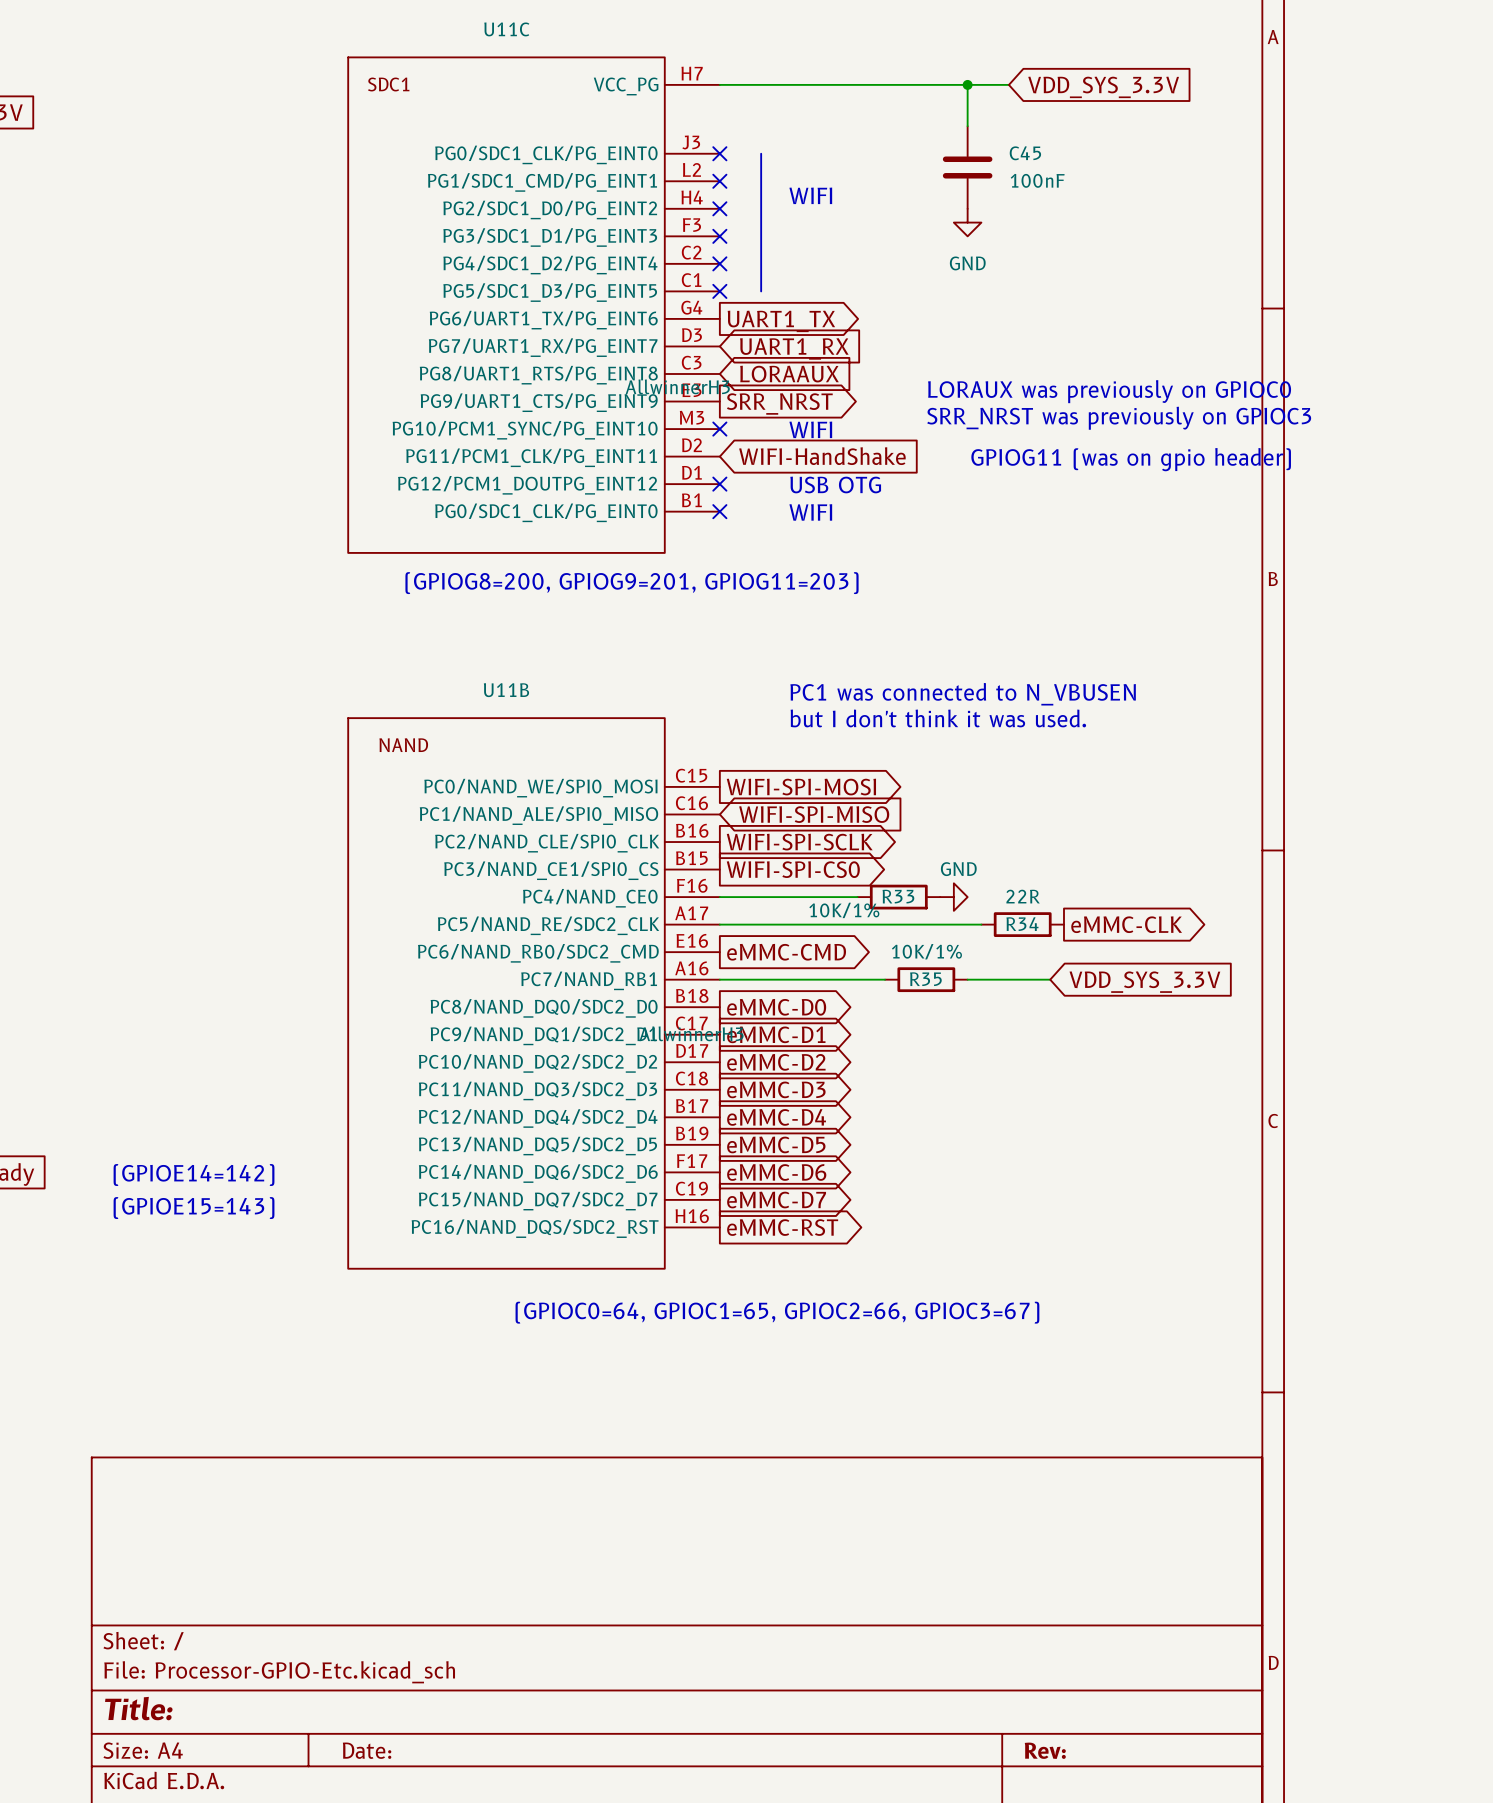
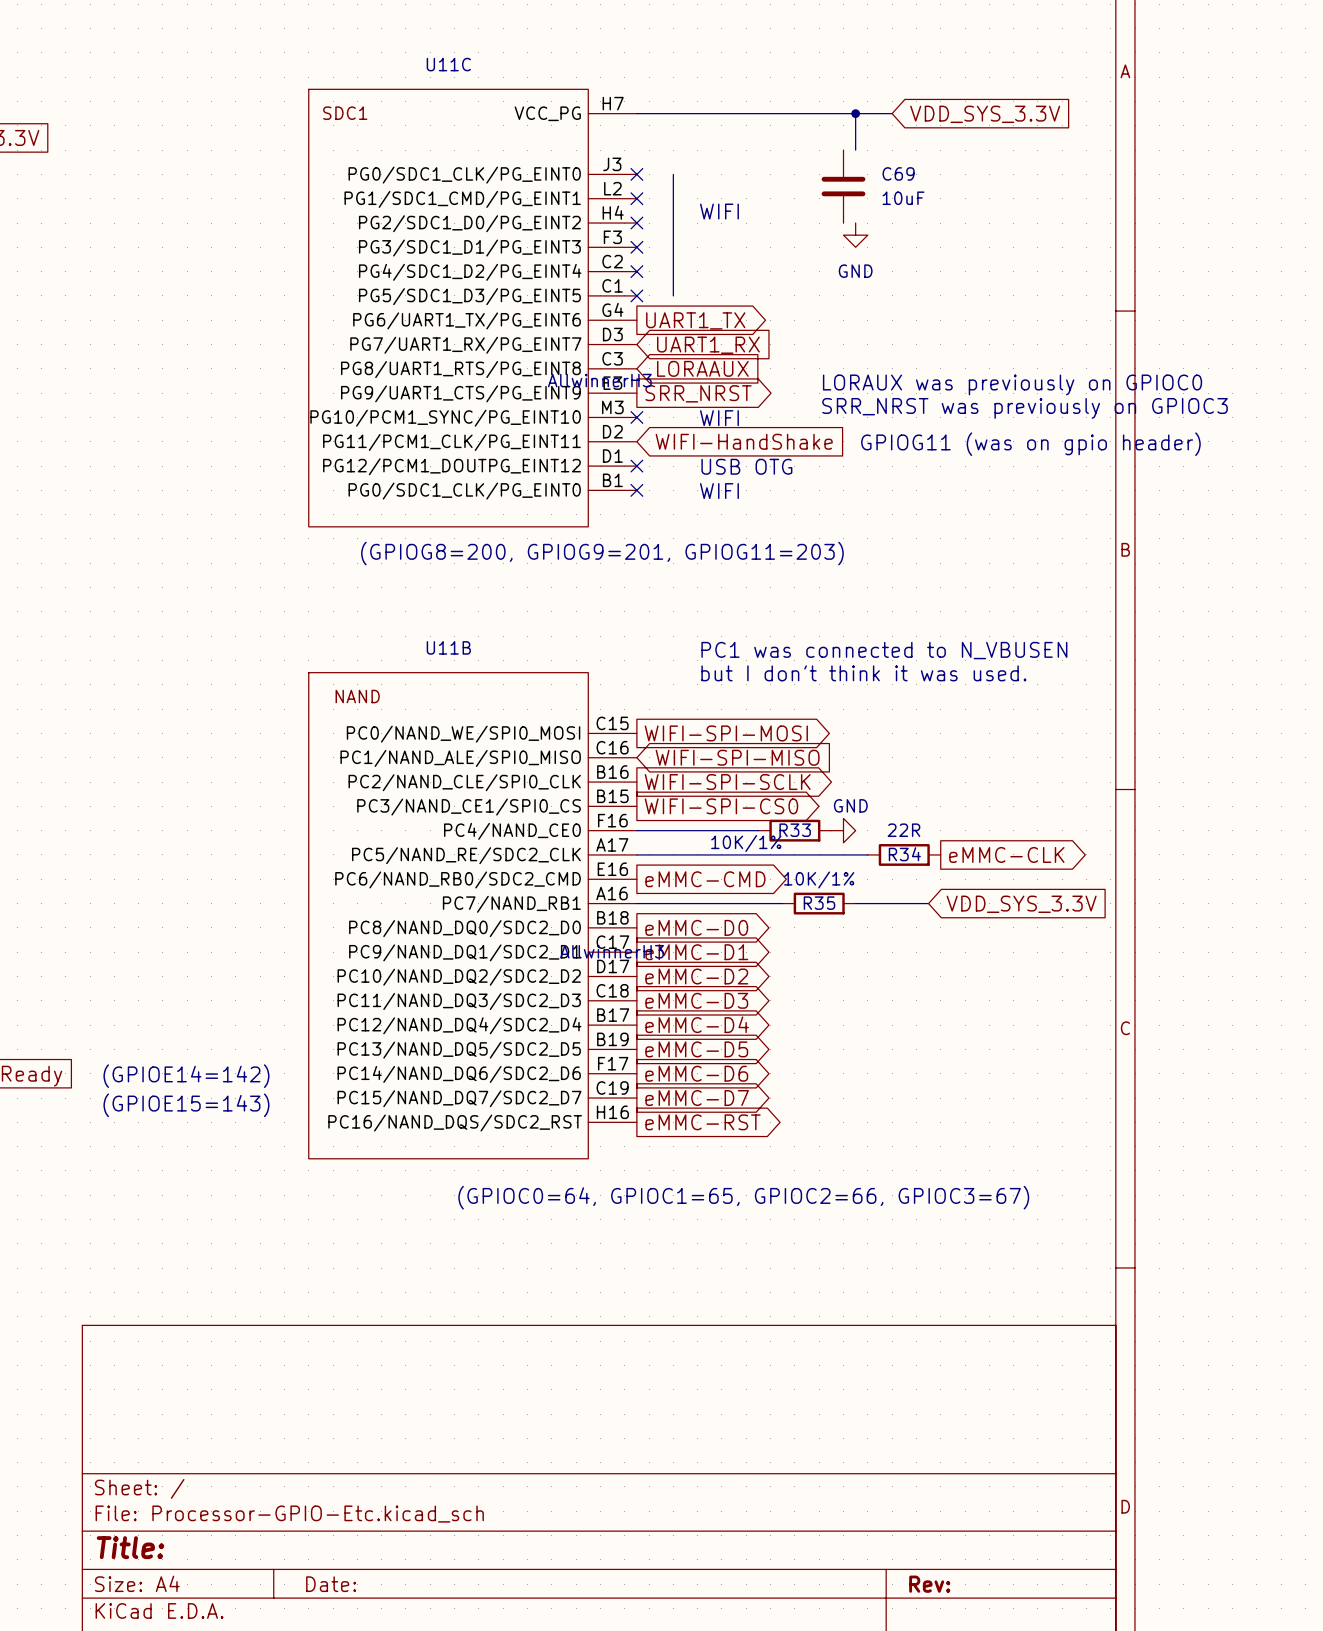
C69: none -> 10uF (843, 186)
C45: 100nF (967, 167) -> none

